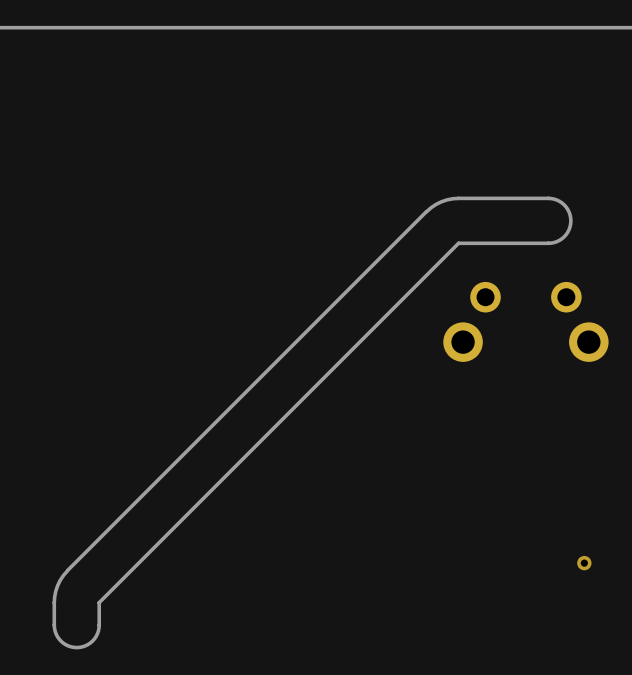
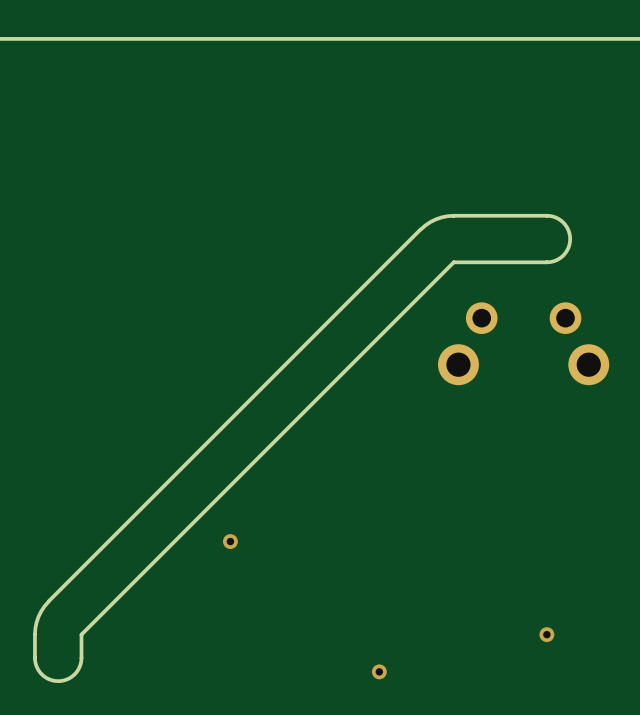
via: none -> (230, 541)
via: (584, 563) -> none
via: none -> (546, 634)
via: none -> (379, 671)

